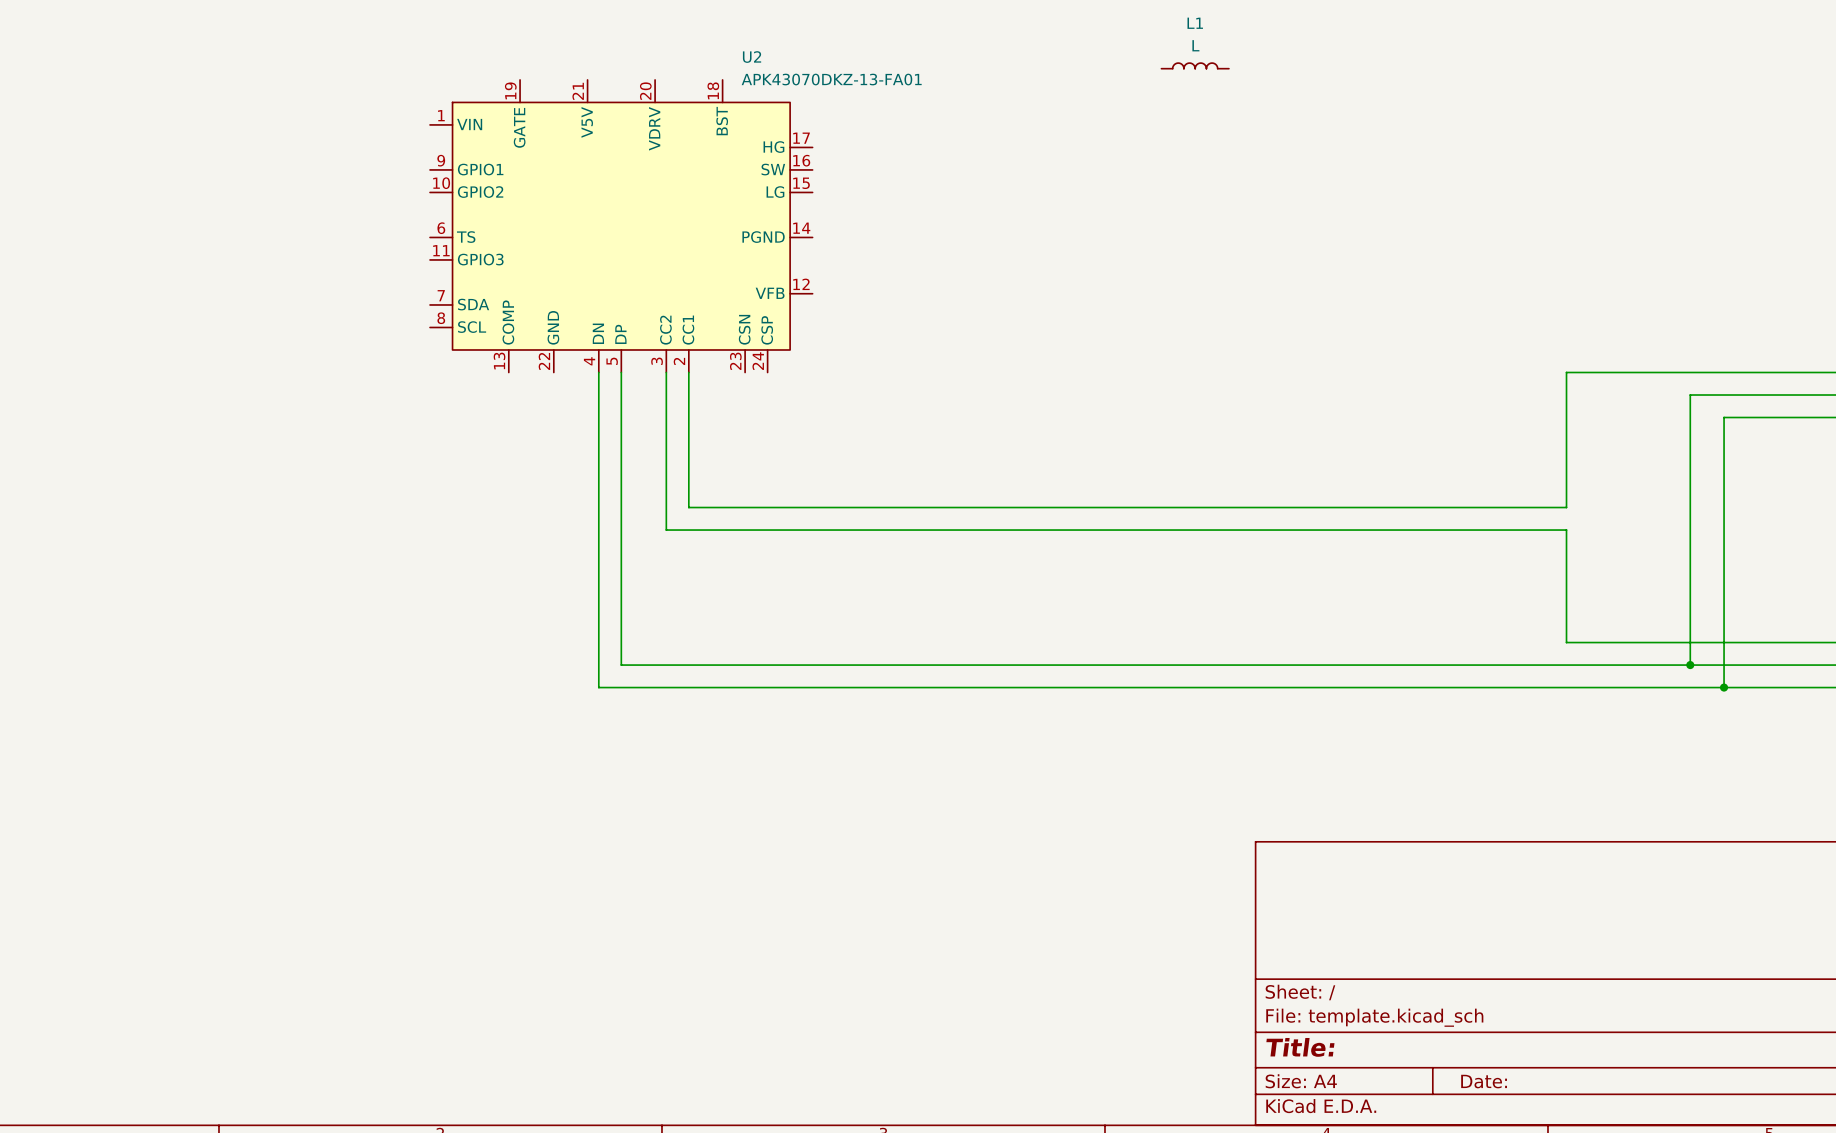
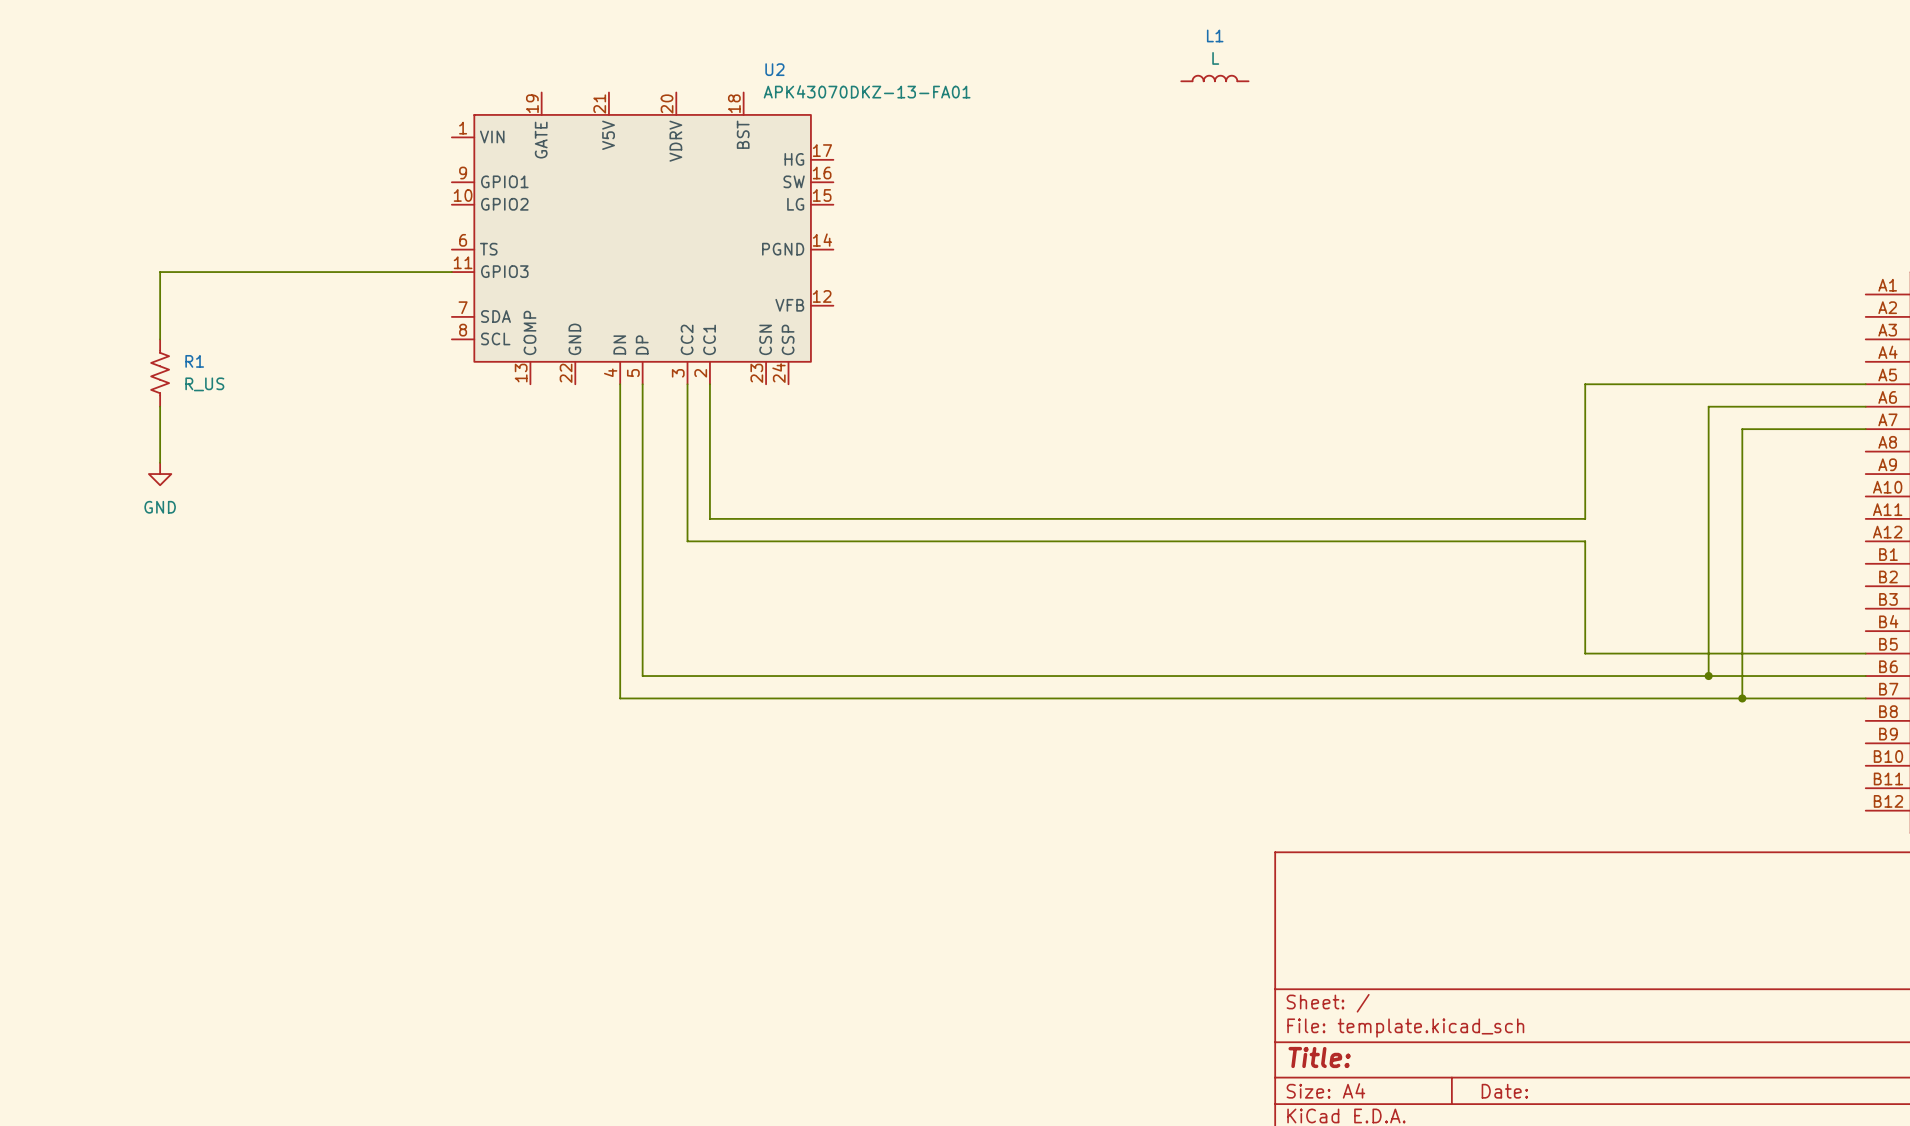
wire: none -> (451, 272) (160, 272) (160, 339)
R1: none -> R_US (160, 373)
wire: none -> (160, 406) (160, 462)
power symbol: none -> GND (160, 474)

